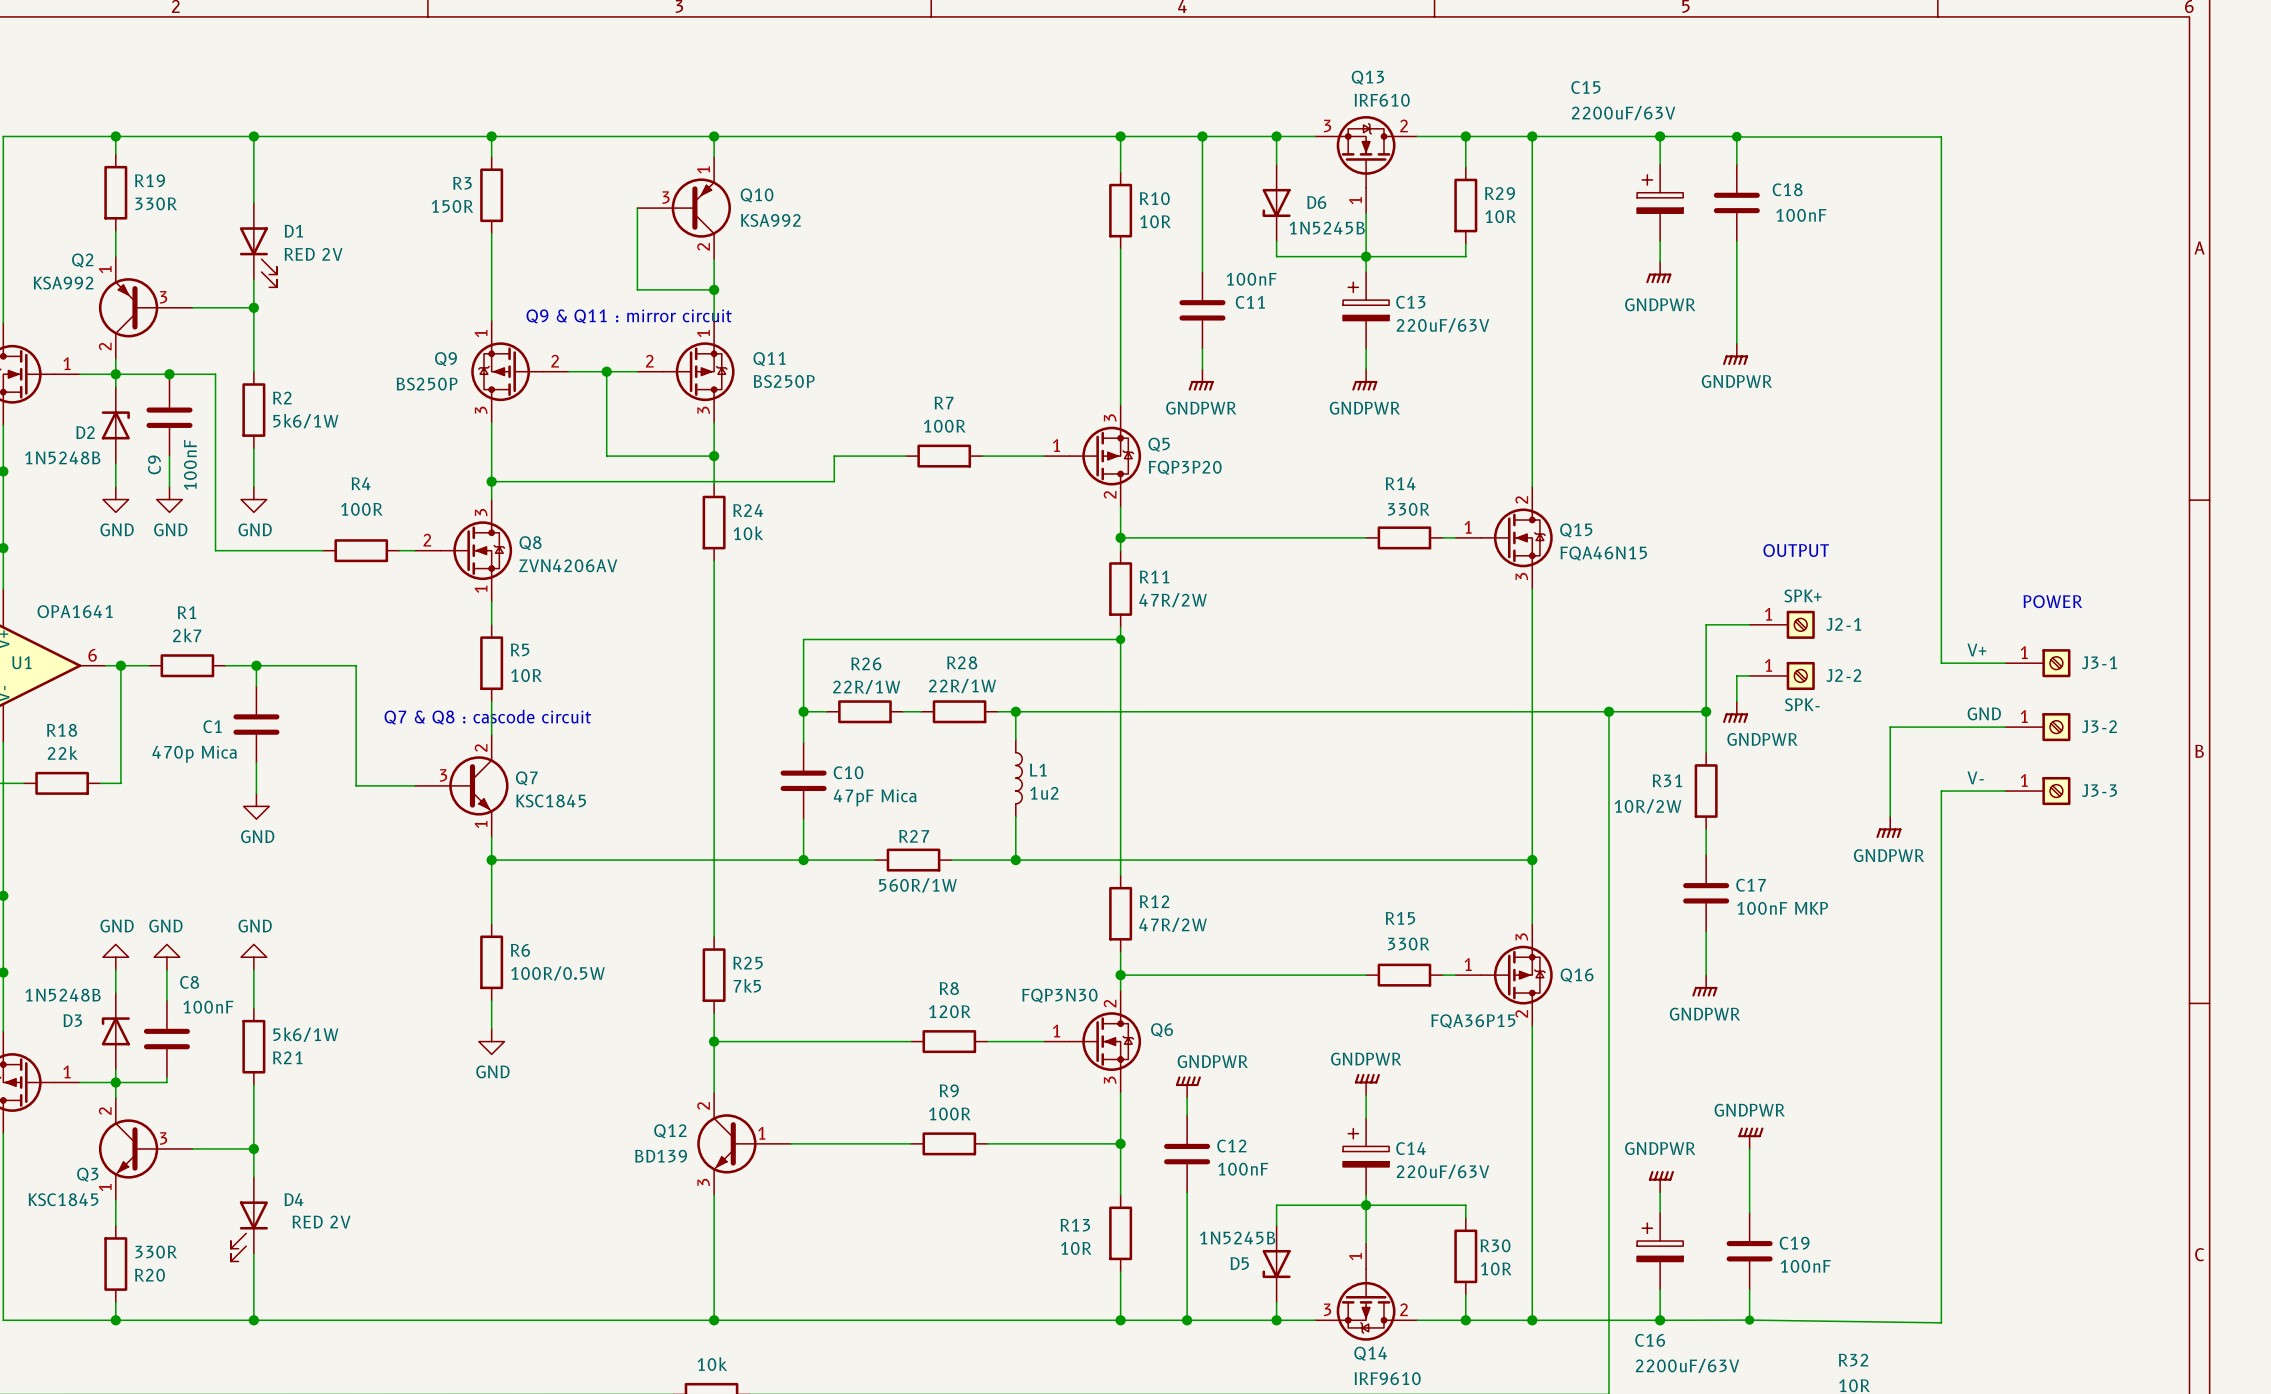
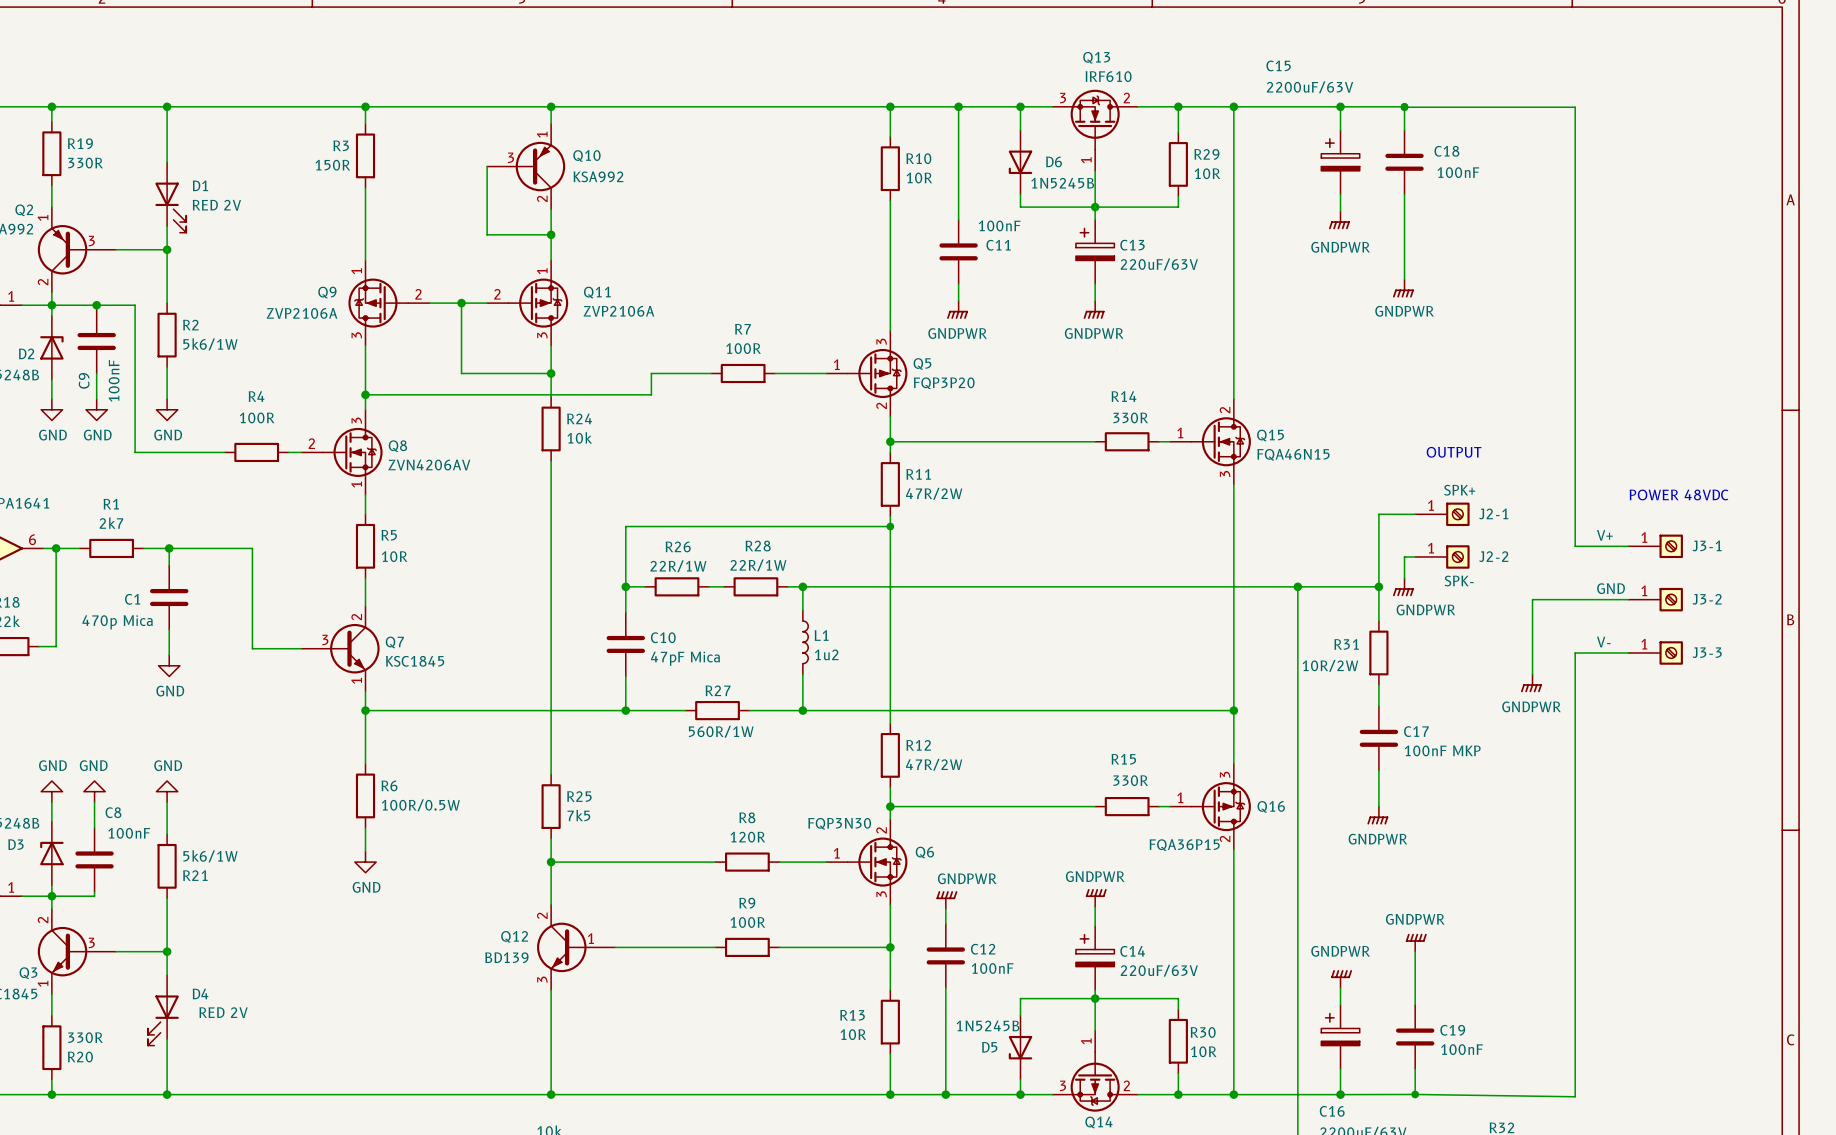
text: Q9 & Q11 : mirror circuit (629, 316) -> none
Q11 value: BS250P (784, 381) -> ZVP2106A (618, 311)
Q9 value: BS250P (427, 384) -> ZVP2106A (301, 313)
text: POWER (2052, 601) -> POWER 48VDC (1678, 494)
text: Q7 & Q8 : cascode circuit (487, 717) -> none

